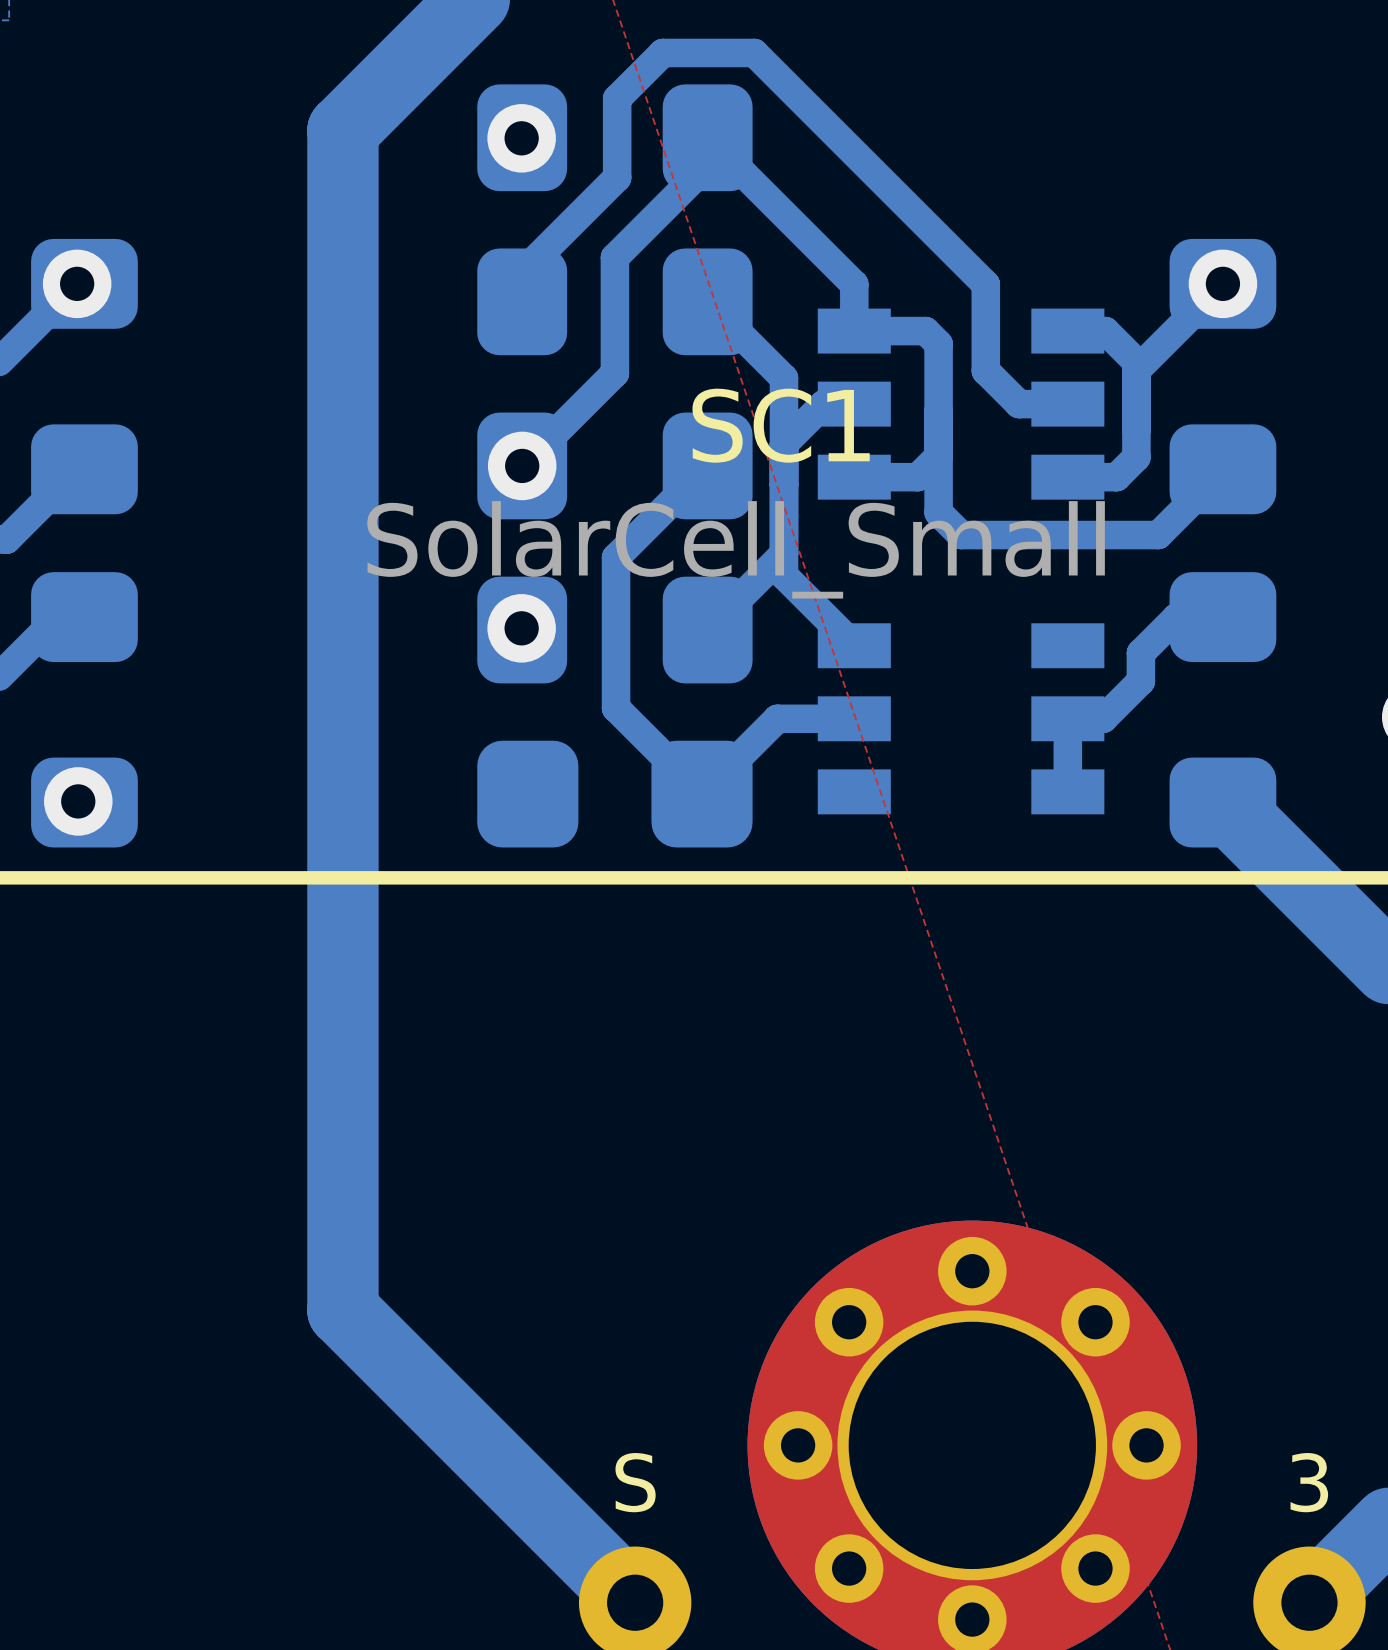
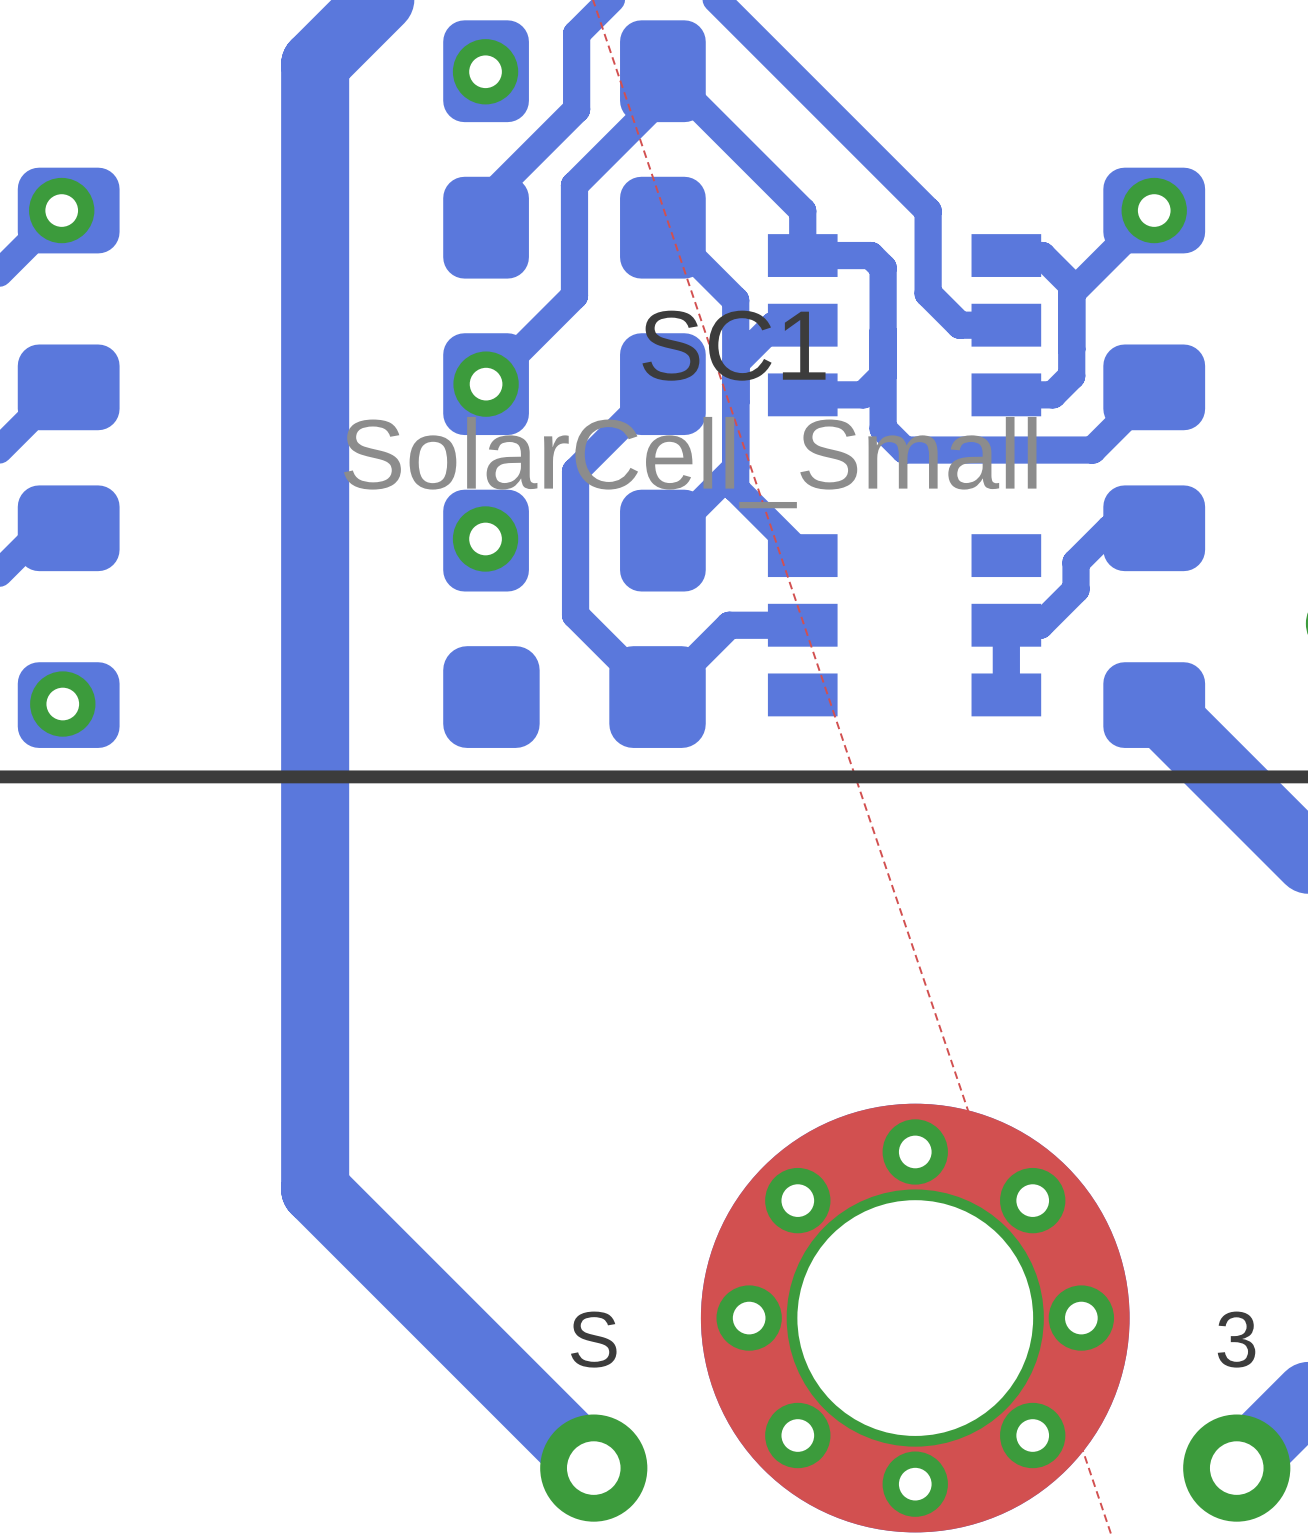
text position: S (635, 1482) -> S (593, 1339)
text position: 3 (1309, 1482) -> 3 (1236, 1339)

